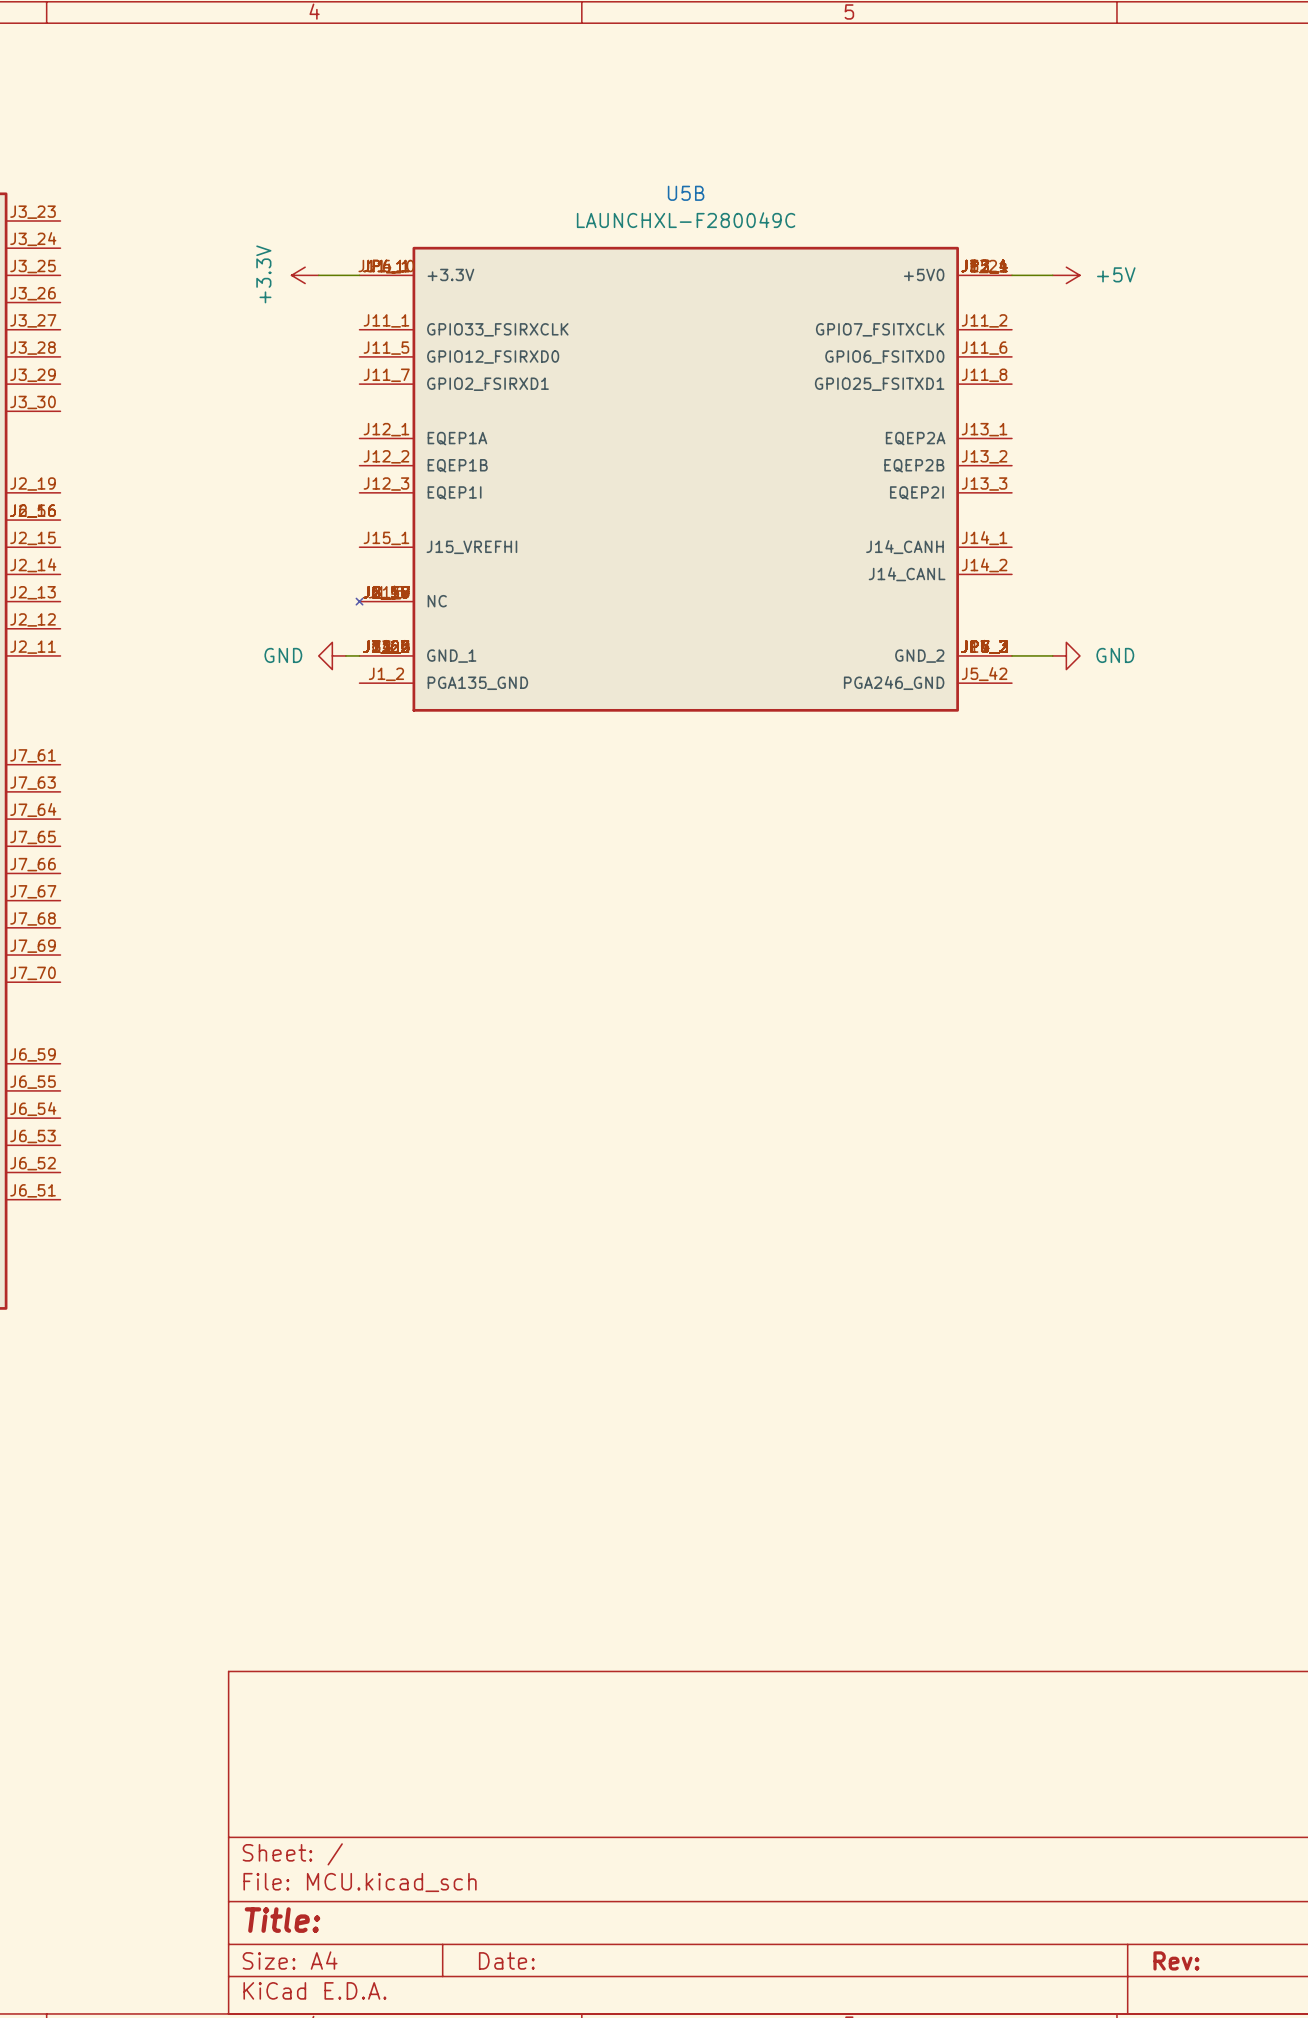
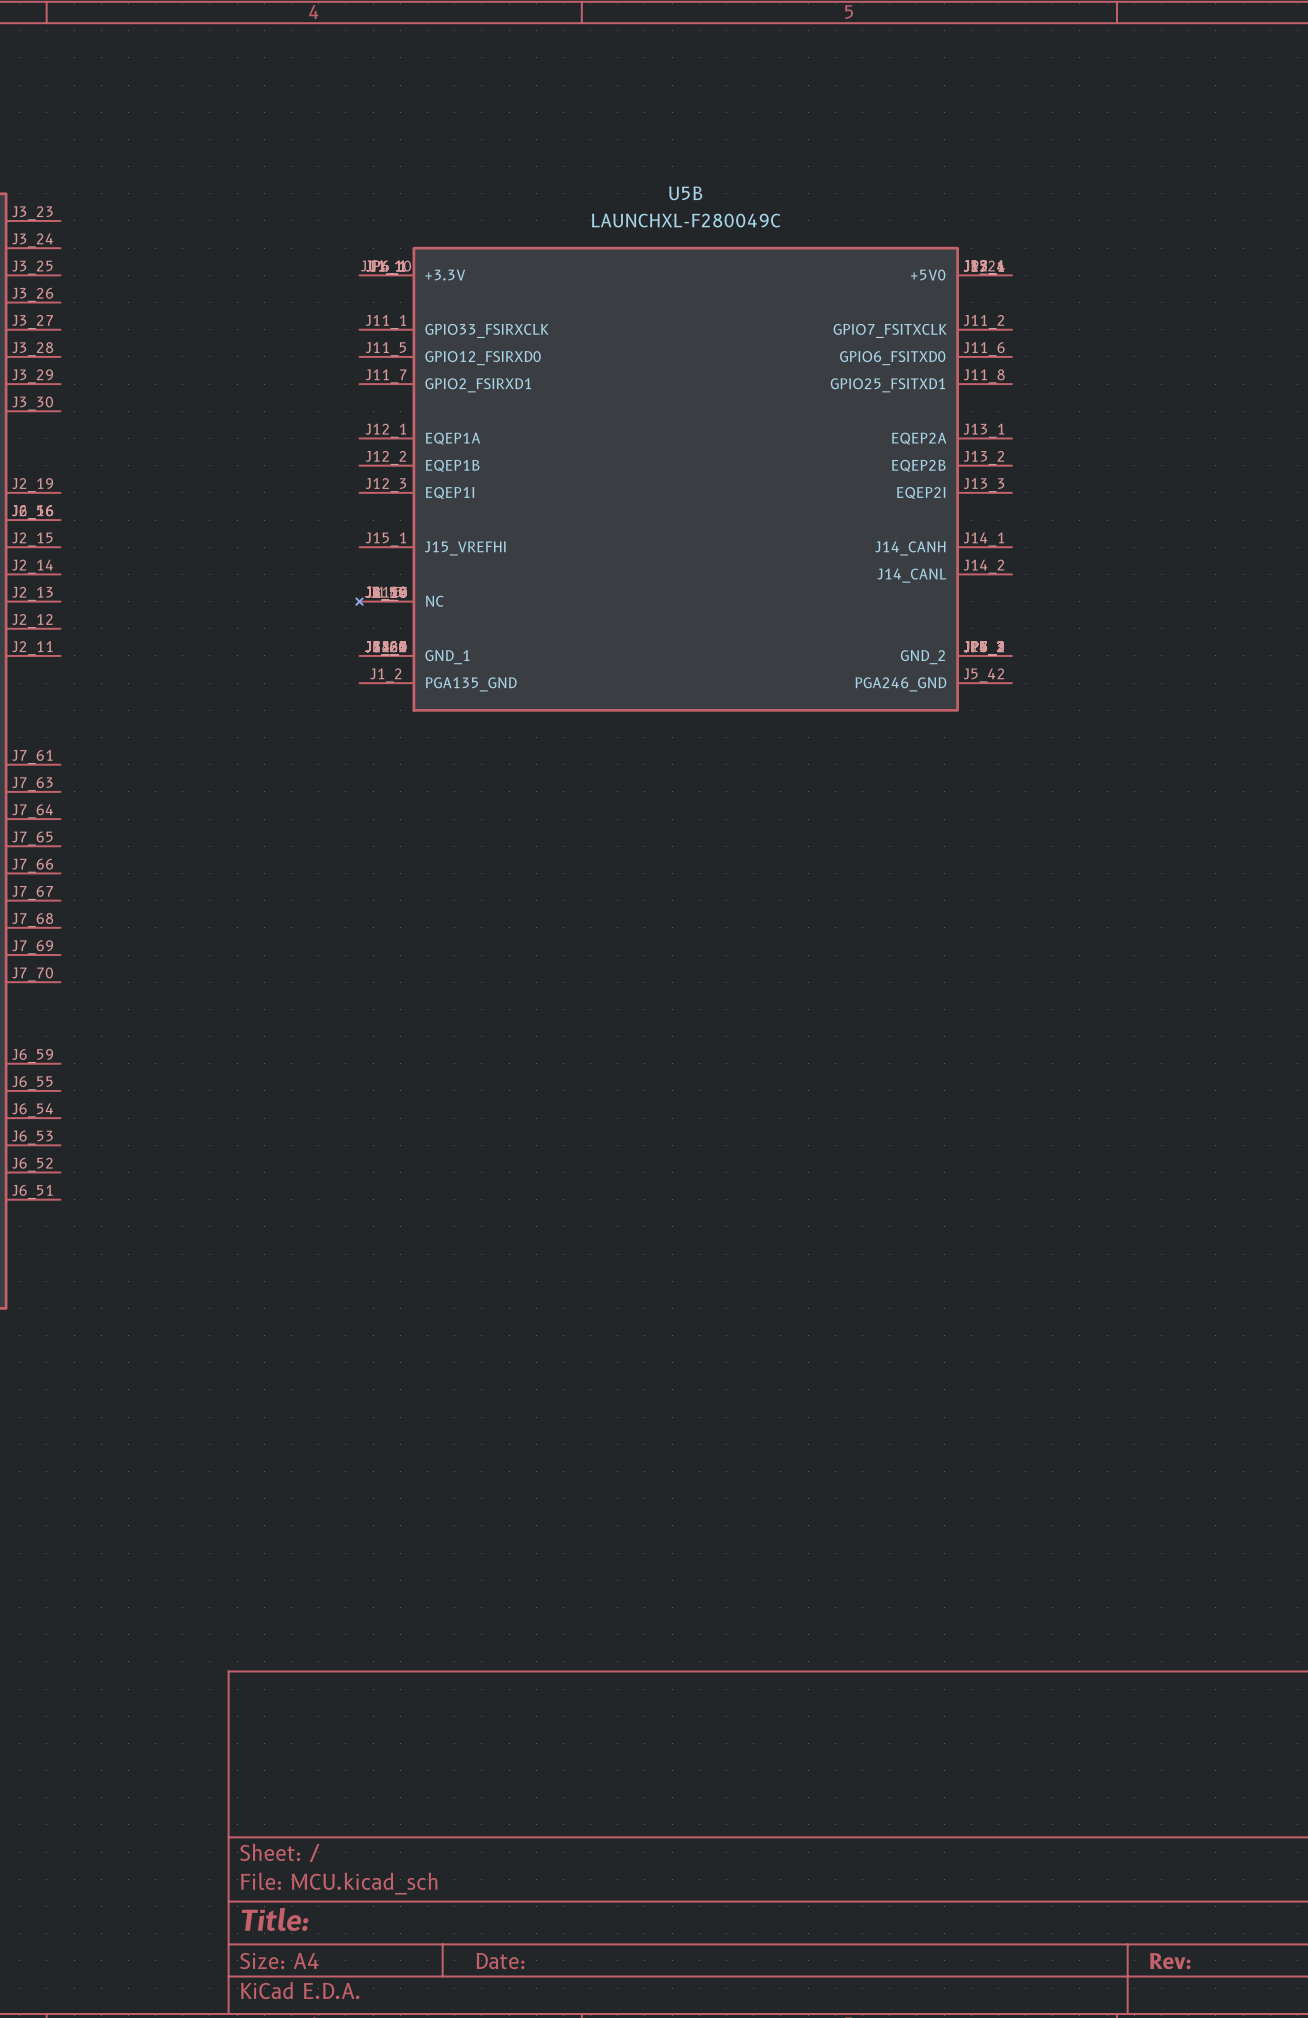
power symbol: +3.3V (305, 275) -> none
wire: (318, 275) (359, 275) -> none
wire: (1011, 275) (1052, 275) -> none
power symbol: +5V (1066, 275) -> none
power symbol: GND (332, 655) -> none
wire: (345, 655) (359, 655) -> none
wire: (1011, 655) (1052, 655) -> none
power symbol: GND (1066, 655) -> none

